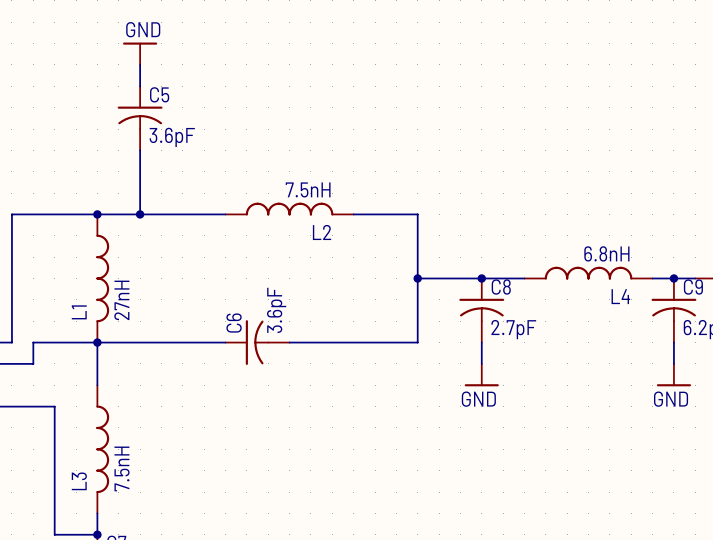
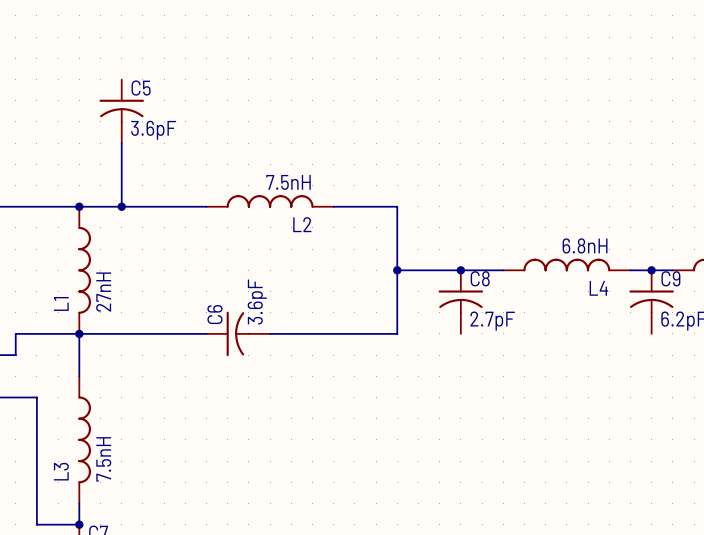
power symbol: GND (140, 53) -> none
wire: (140, 64) (140, 86) -> none
wire: (481, 342) (481, 363) -> none
wire: (673, 342) (673, 363) -> none
power symbol: GND (481, 375) -> none
power symbol: GND (673, 375) -> none

